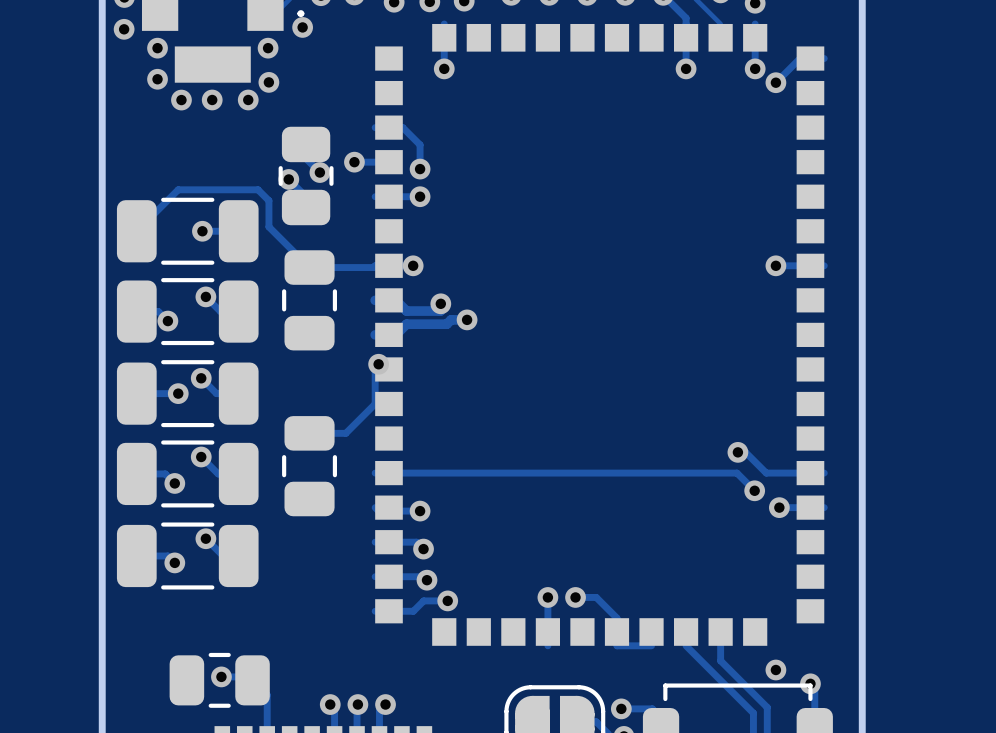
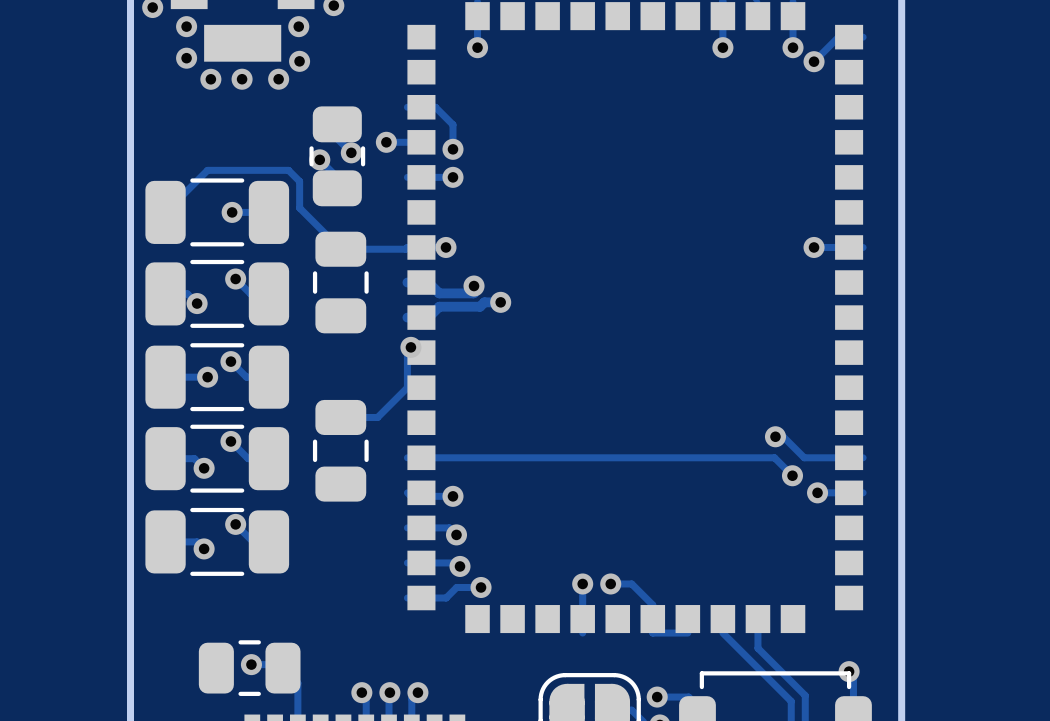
via: (775, 670) -> none

